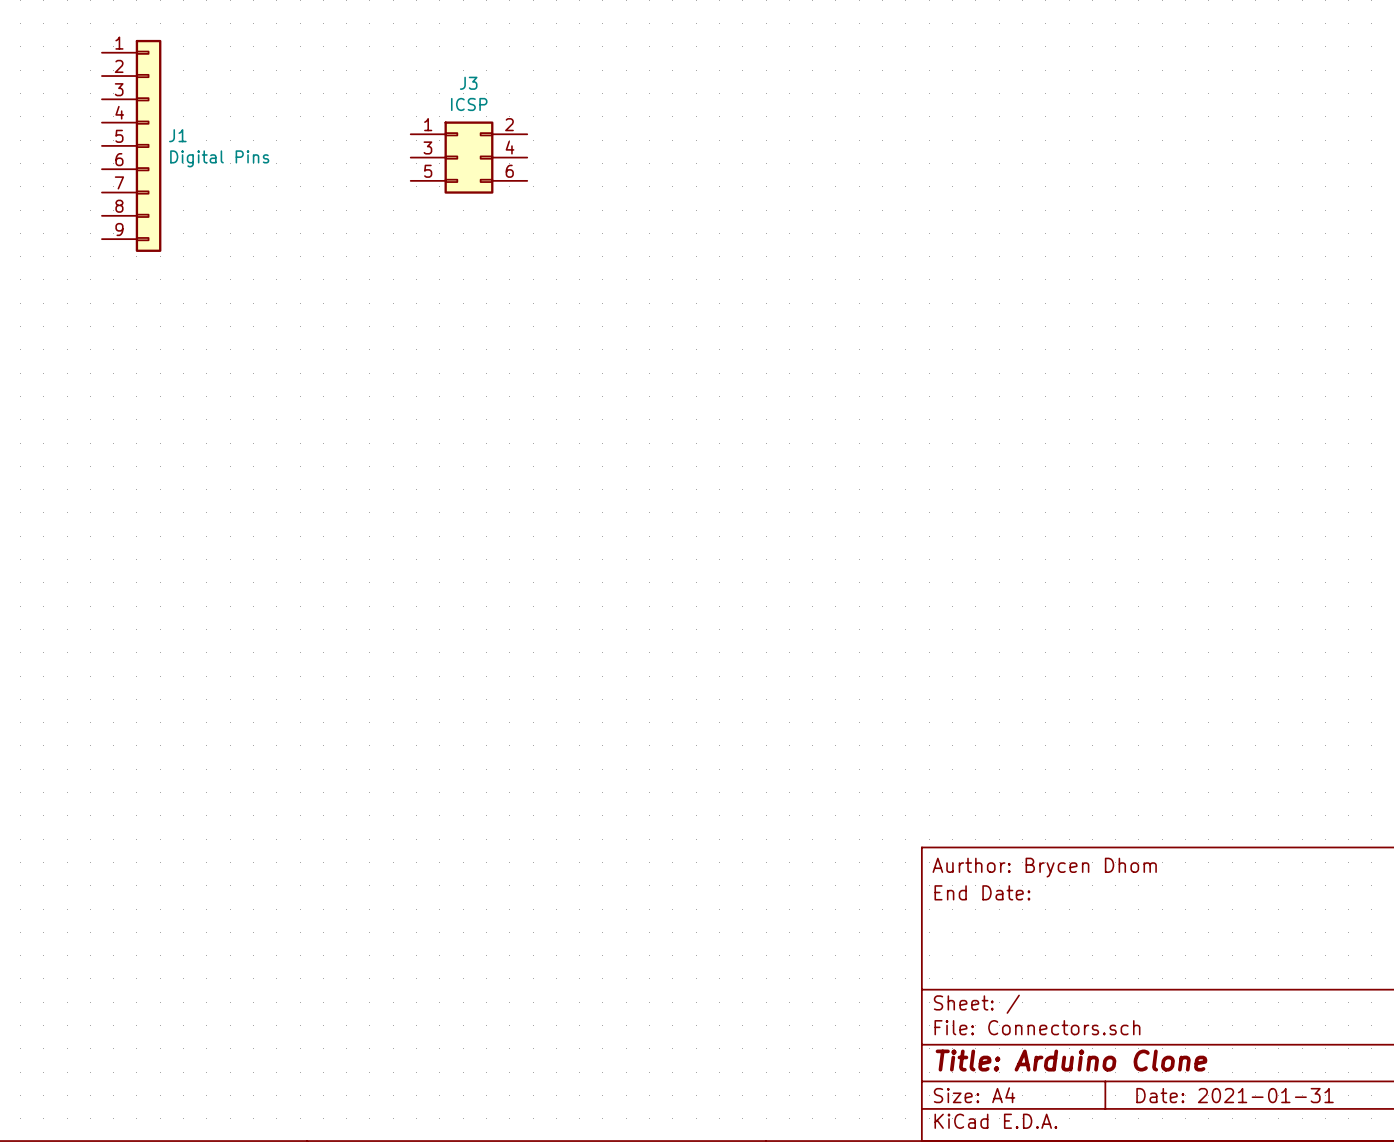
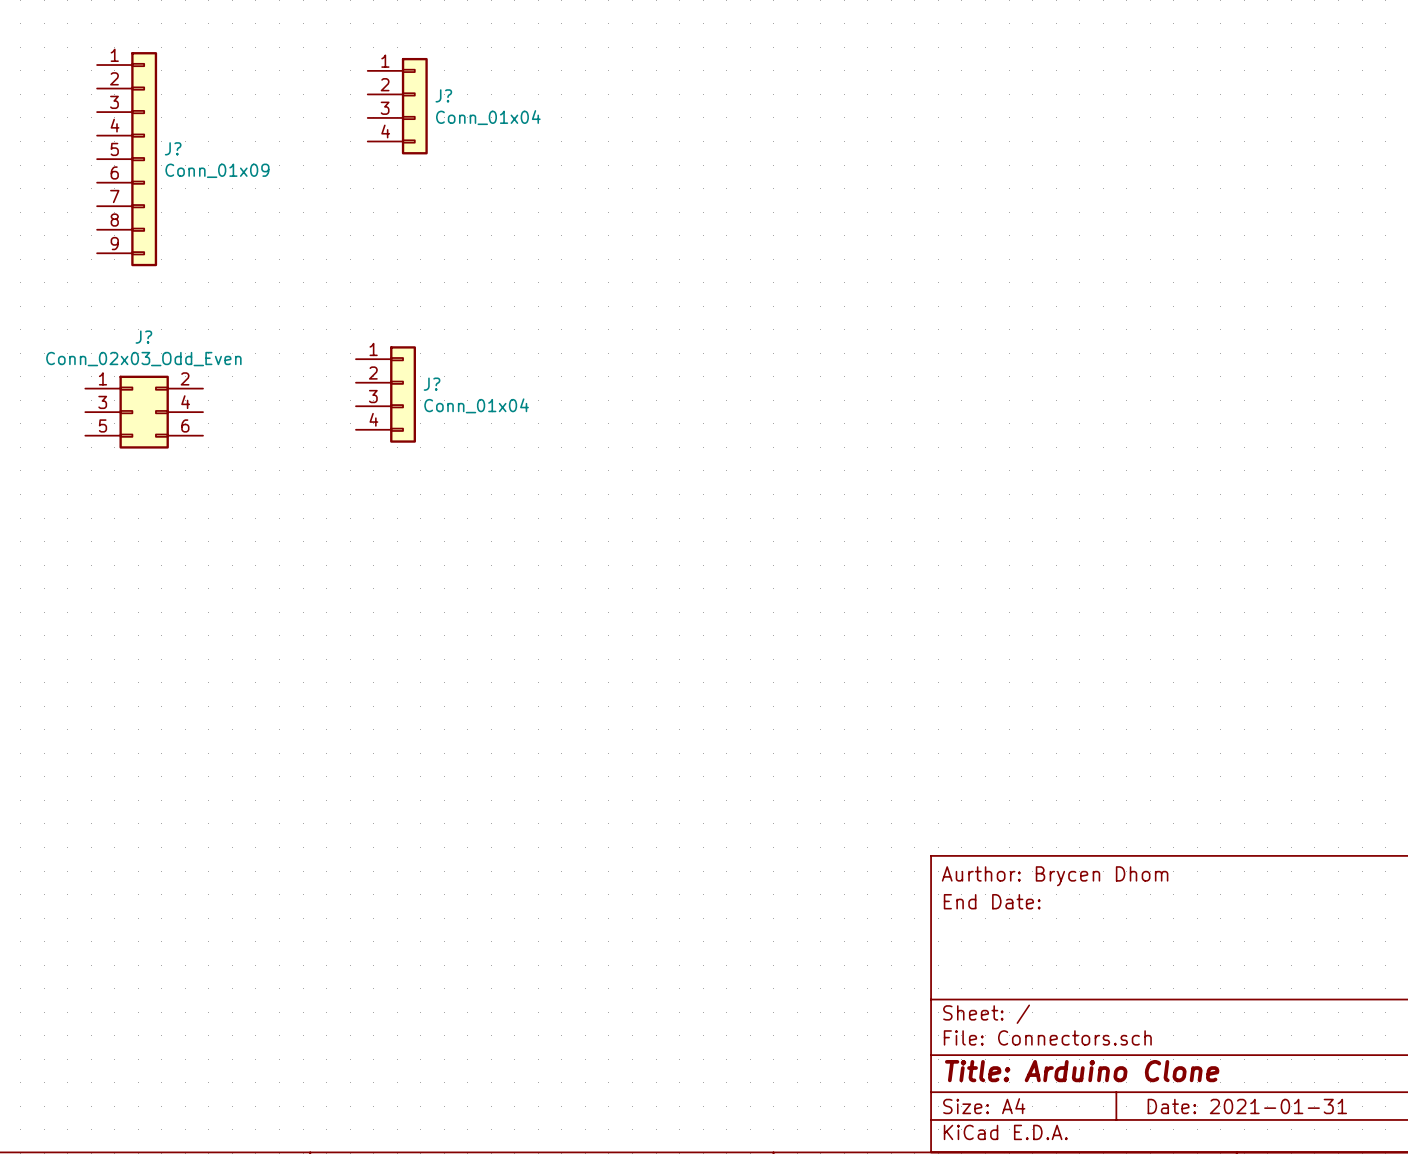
J?: none -> Conn_01x04 (397, 106)
J1: Digital Pins (131, 145) -> none
J?: none -> Conn_01x09 (127, 159)
J3: ICSP (468, 157) -> none
J?: none -> Conn_01x04 (385, 394)
J?: none -> Conn_02x03_Odd_Even (144, 412)

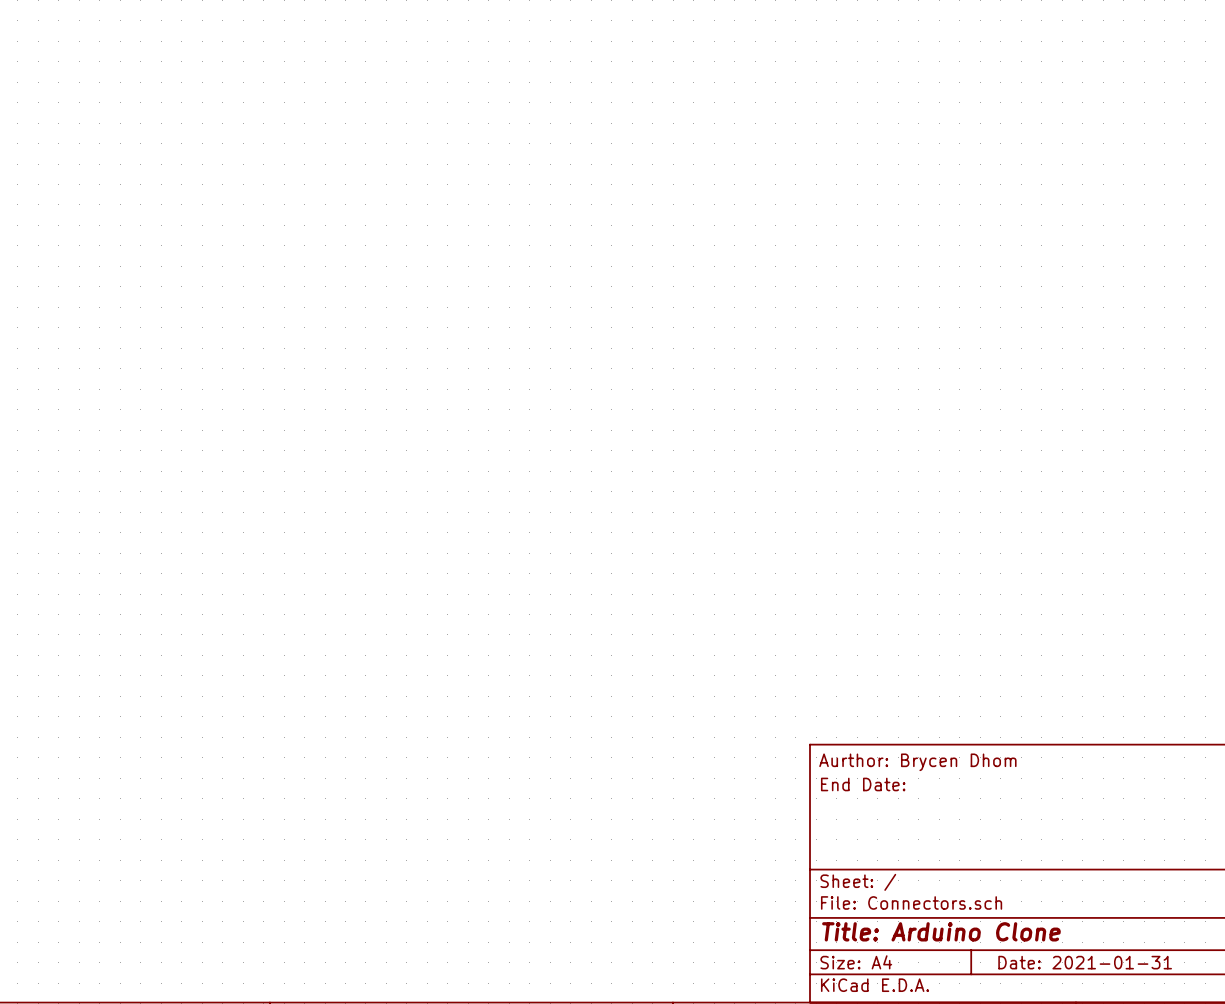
J?: Conn_01x04 (397, 106) -> none
J?: Conn_01x09 (127, 159) -> none
J?: Conn_01x04 (385, 394) -> none
J?: Conn_02x03_Odd_Even (144, 412) -> none

